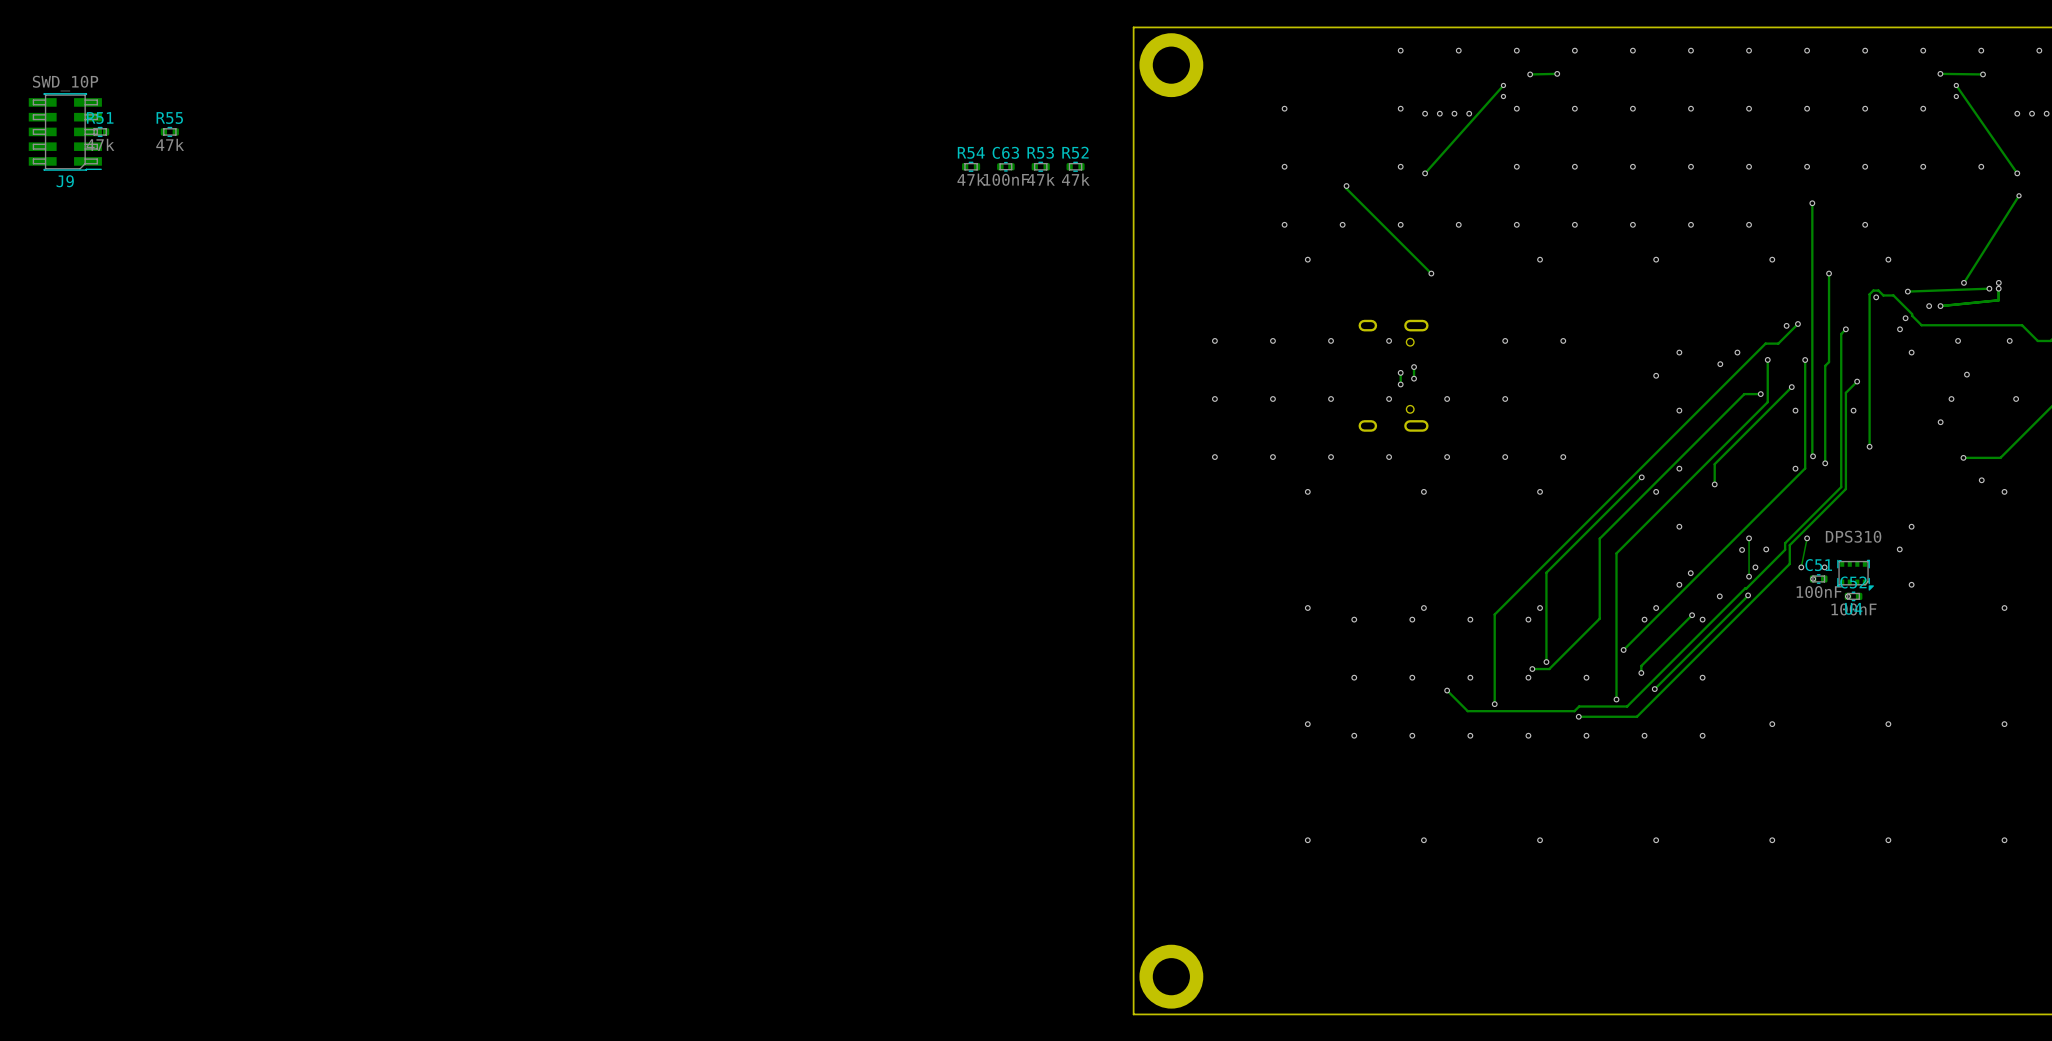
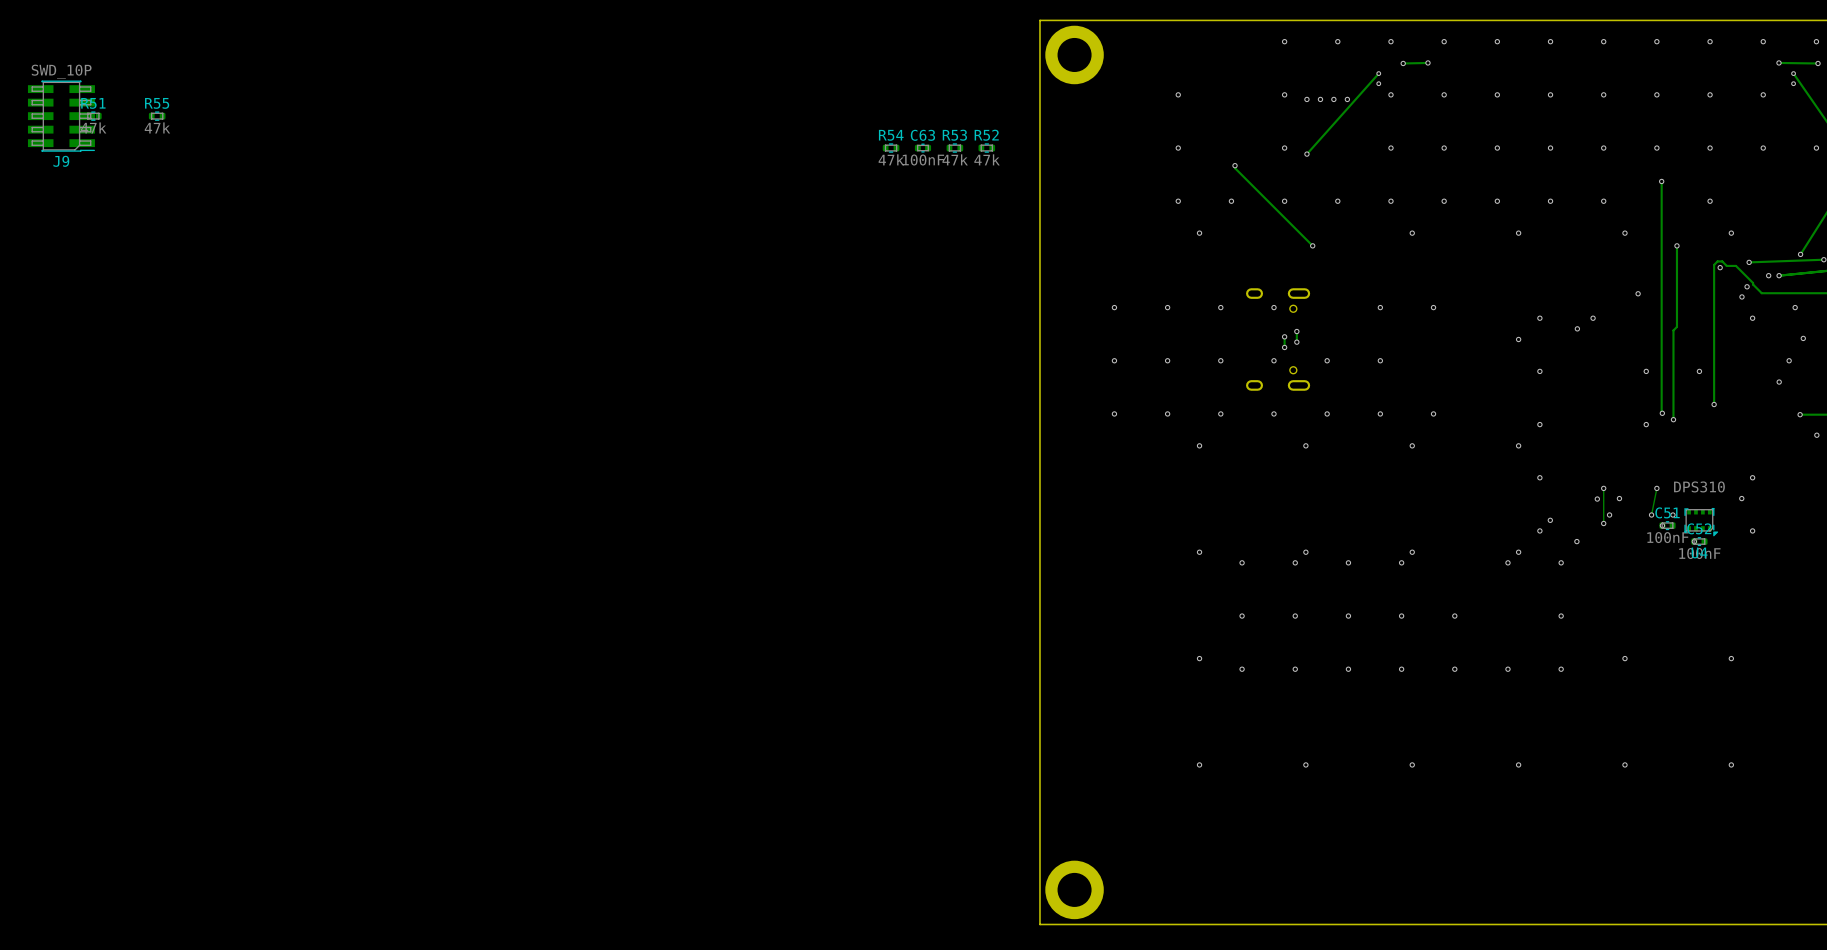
track: (1797, 324) (1778, 343) (1765, 343) (1494, 614) (1494, 704) -> none
via: (1797, 324) -> none
track: (1845, 329) (1841, 333) (1841, 487) (1785, 543) (1785, 549) (1627, 706) (1579, 706) (1574, 711) (1467, 711) (1447, 690) -> none
via: (1845, 329) -> none
track: (1767, 359) (1767, 402) (1616, 553) (1616, 699) -> none
via: (1767, 359) -> none
track: (1805, 360) (1805, 468) (1623, 649) -> none
via: (1805, 360) -> none
track: (1857, 381) (1845, 392) (1845, 489) (1789, 545) (1789, 563) (1636, 716) (1578, 716) -> none
via: (1857, 381) -> none
track: (1791, 387) (1714, 464) (1714, 484) -> none
via: (1791, 387) -> none
track: (1760, 394) (1744, 394) (1599, 538) (1599, 618) (1549, 669) (1532, 669) -> none
via: (1760, 394) -> none
track: (1641, 477) (1546, 572) (1546, 662) -> none
via: (1641, 477) -> none
via: (1714, 484) -> none
track: (1748, 595) (1654, 689) -> none
via: (1748, 595) -> none
track: (1692, 615) (1641, 665) (1641, 673) -> none
via: (1692, 615) -> none
via: (1623, 649) -> none
via: (1546, 662) -> none
via: (1532, 669) -> none
via: (1641, 673) -> none
via: (1654, 689) -> none
via: (1447, 690) -> none
via: (1616, 699) -> none
via: (1494, 704) -> none
via: (1578, 716) -> none

